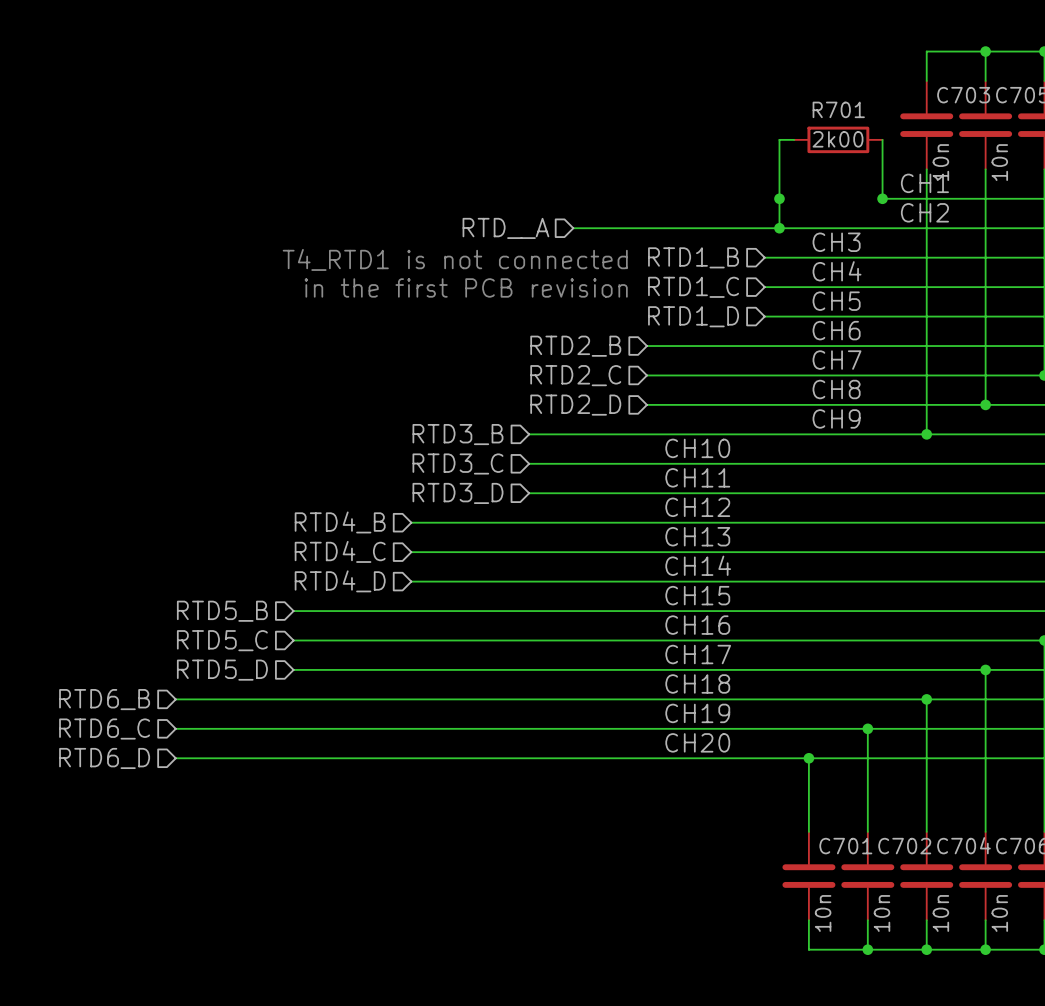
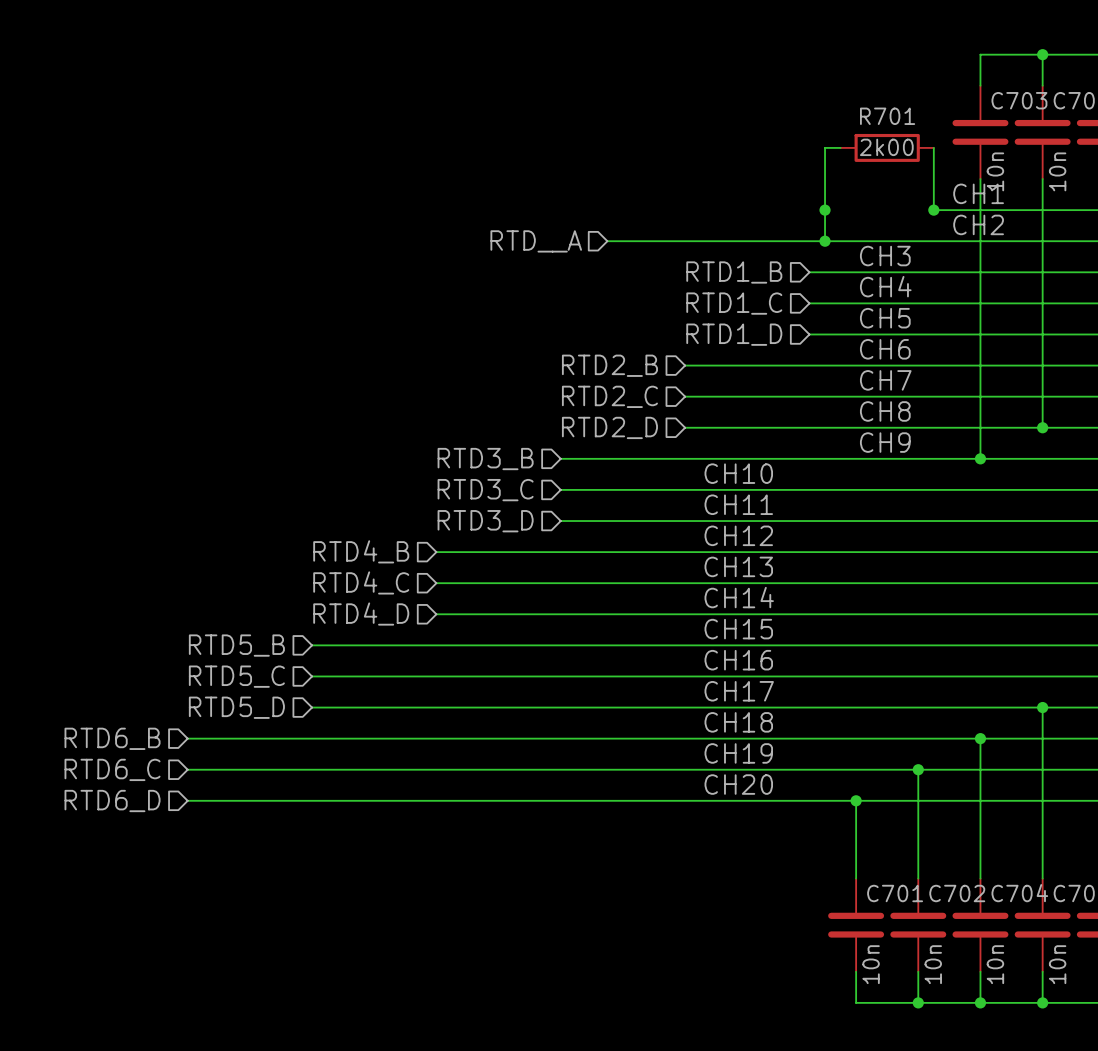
text: T4_RTD1 is not connected (455, 259) -> none
text: in the first PCB revision (466, 287) -> none

